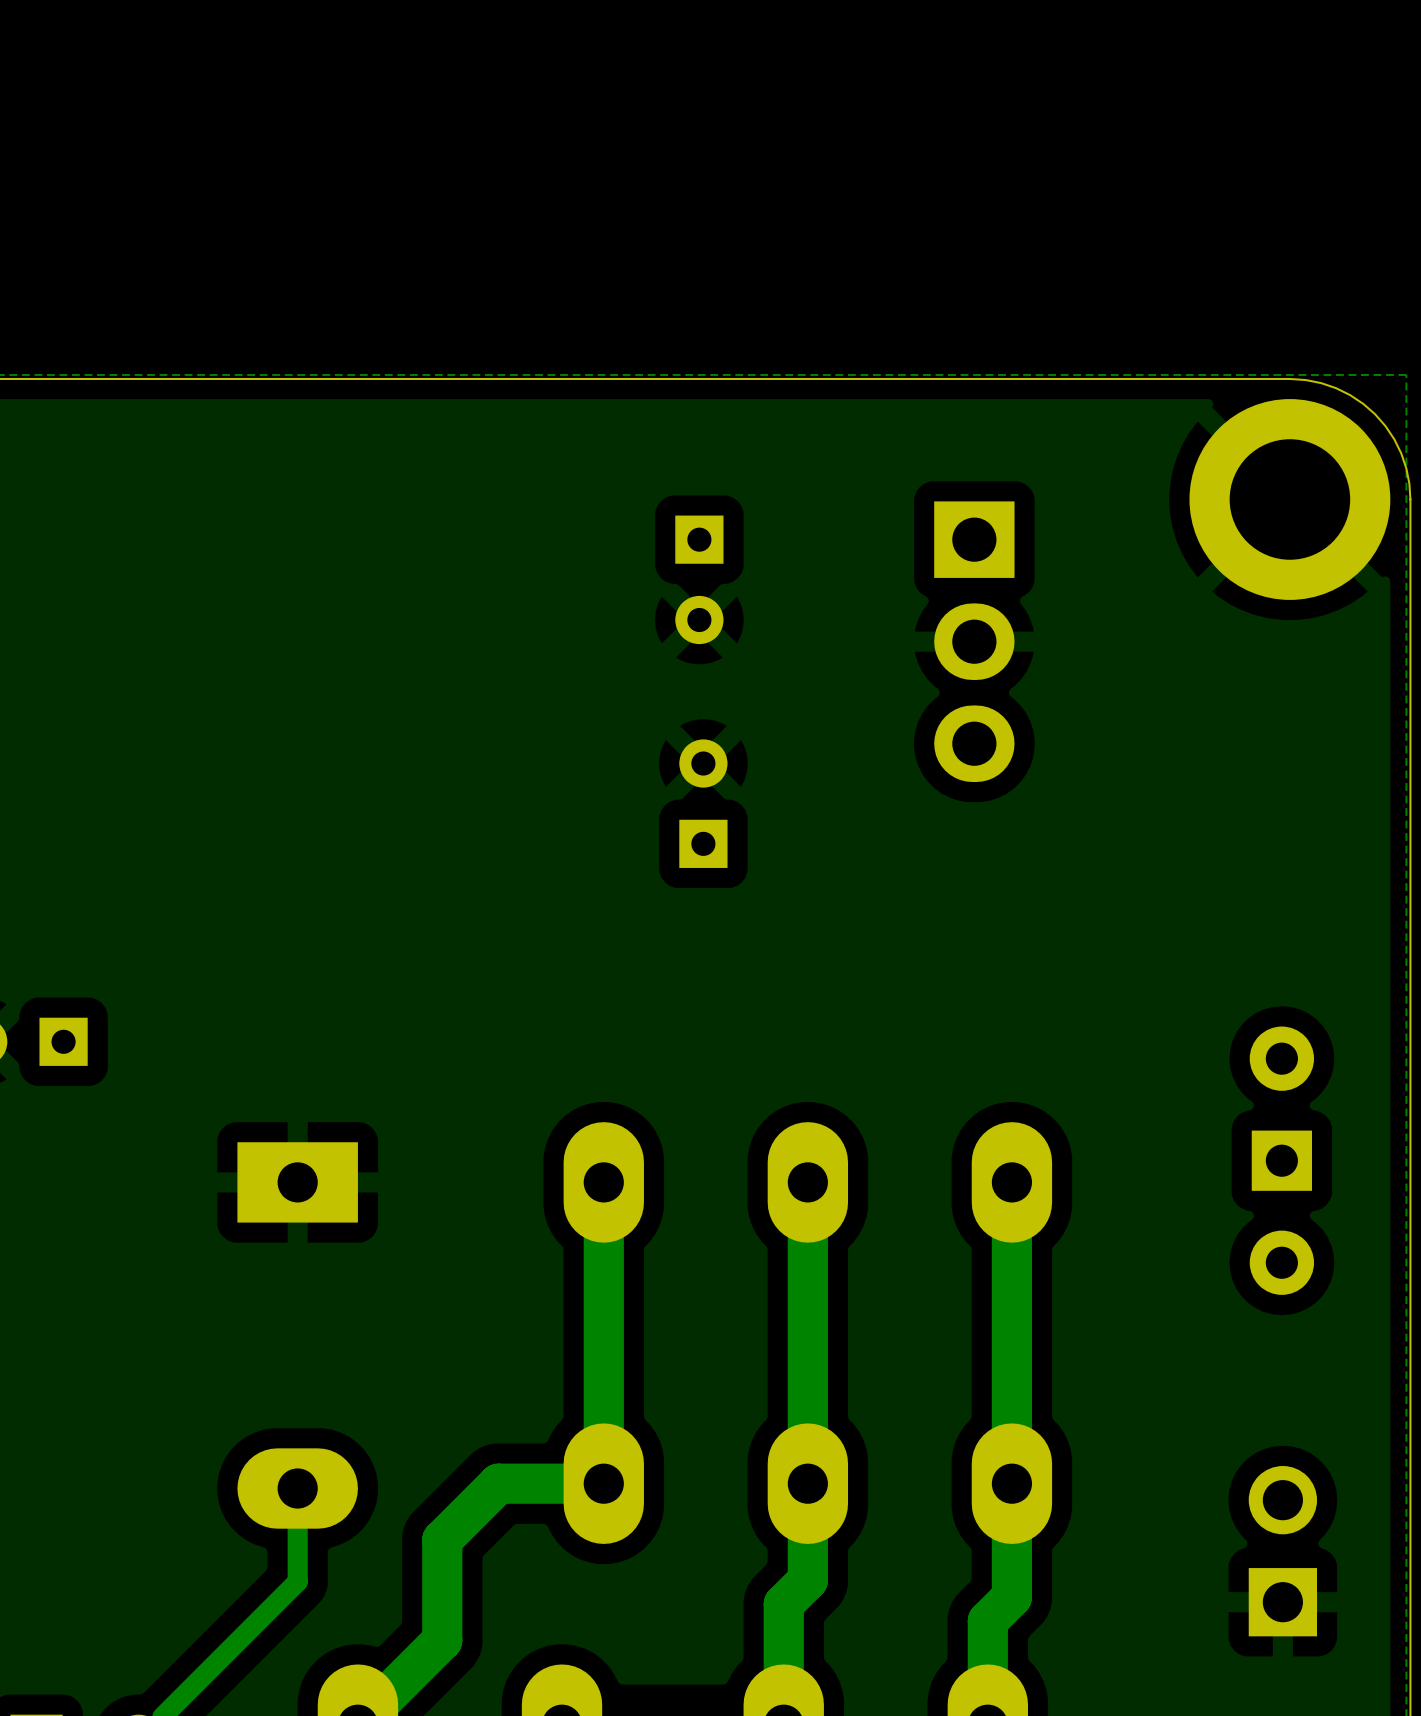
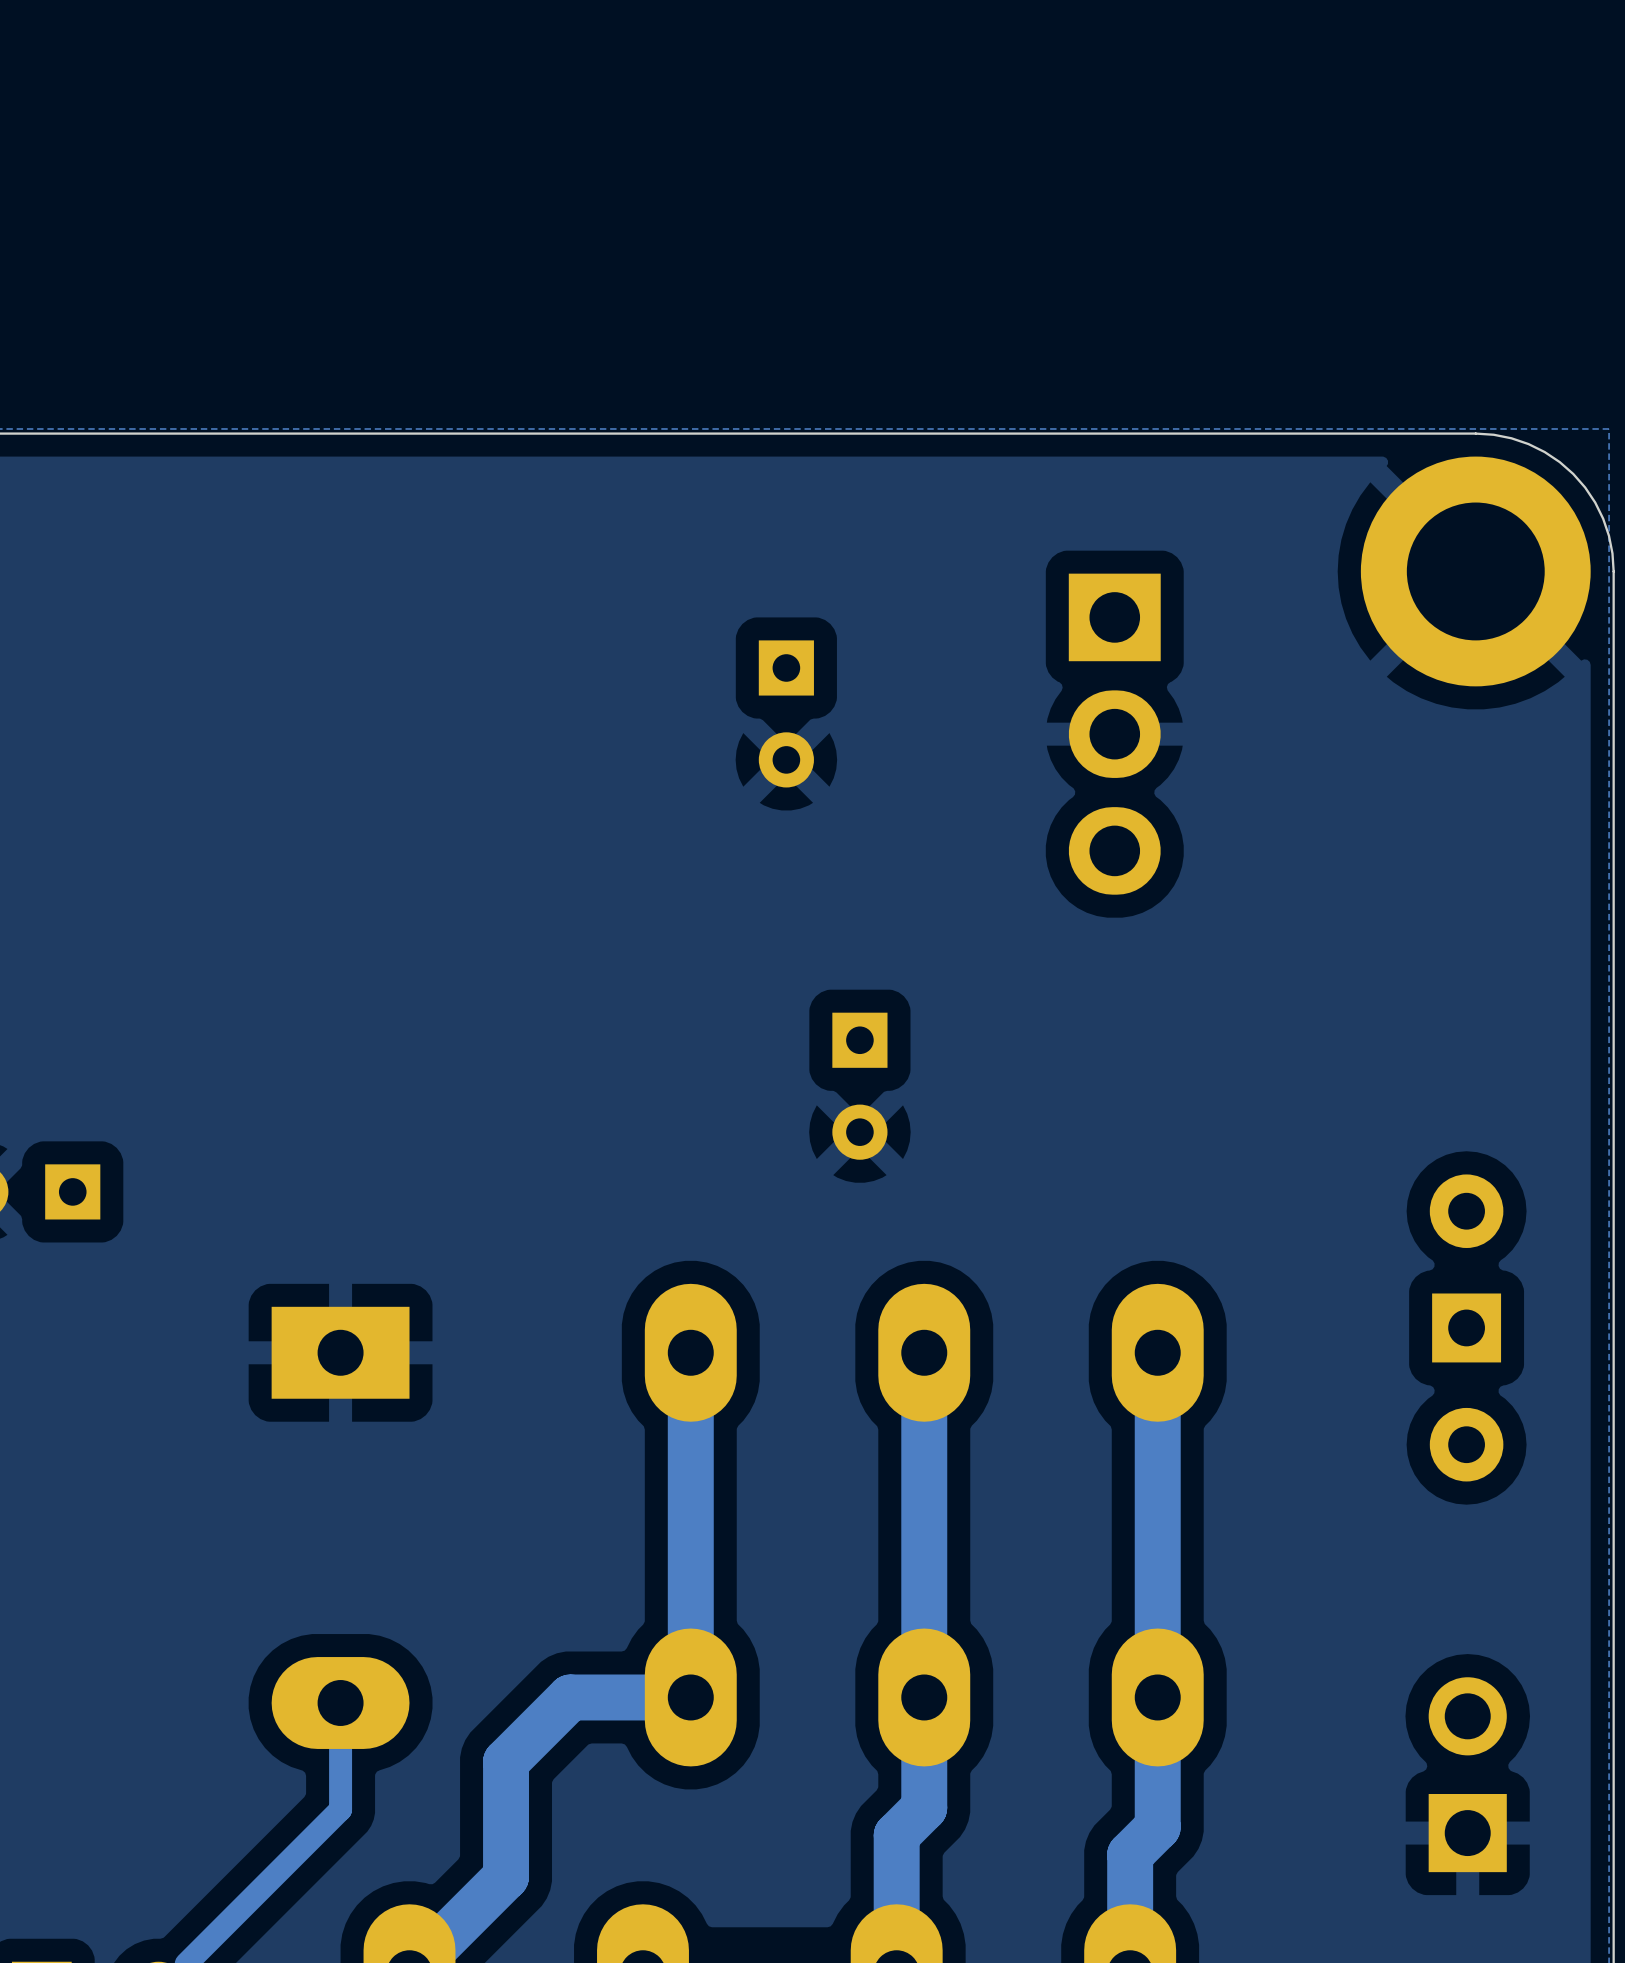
part position: (699, 579) -> (786, 713)
part: (703, 803) -> none
part: none -> (859, 1086)

